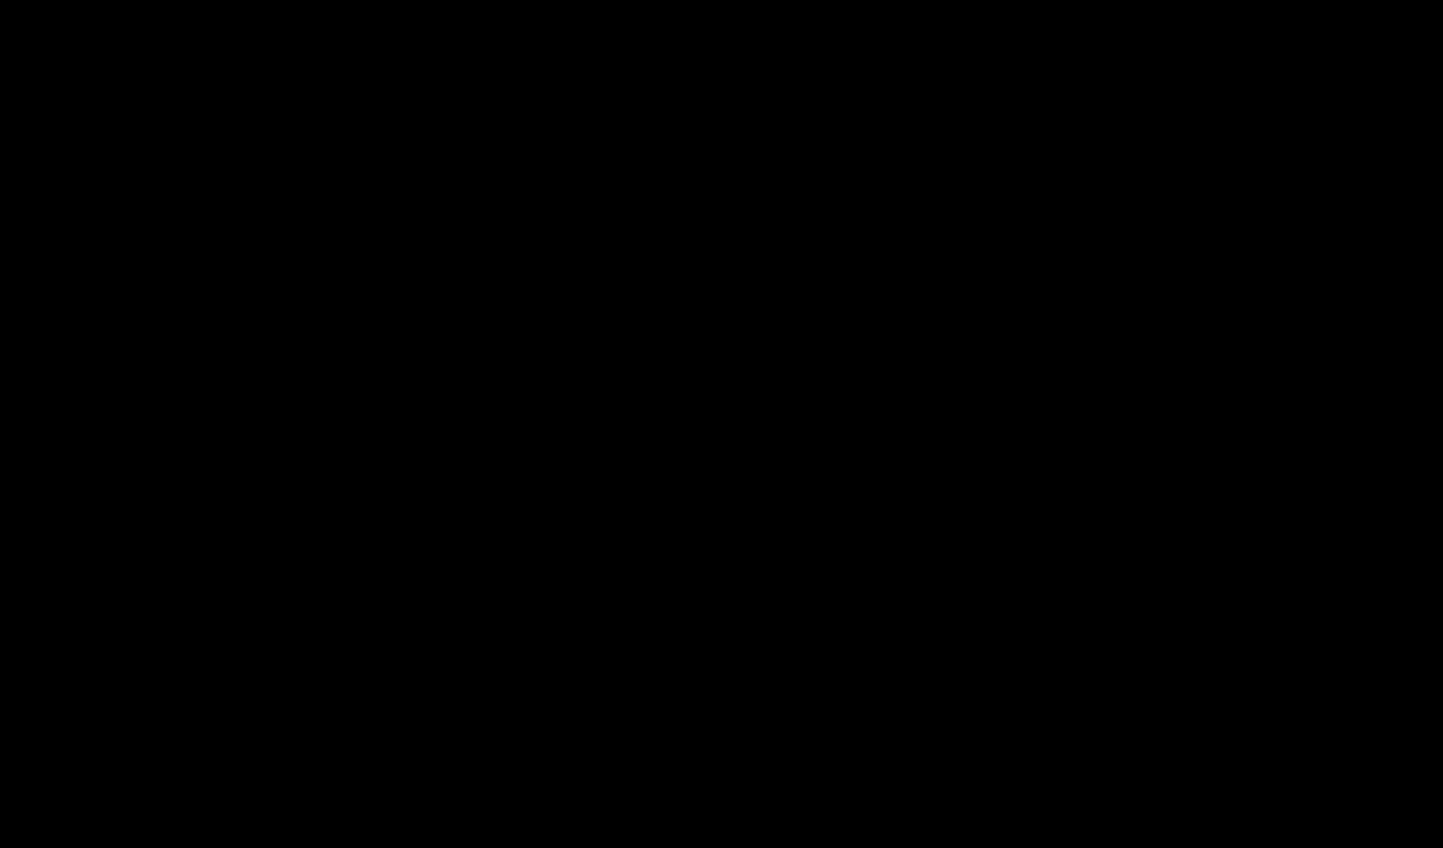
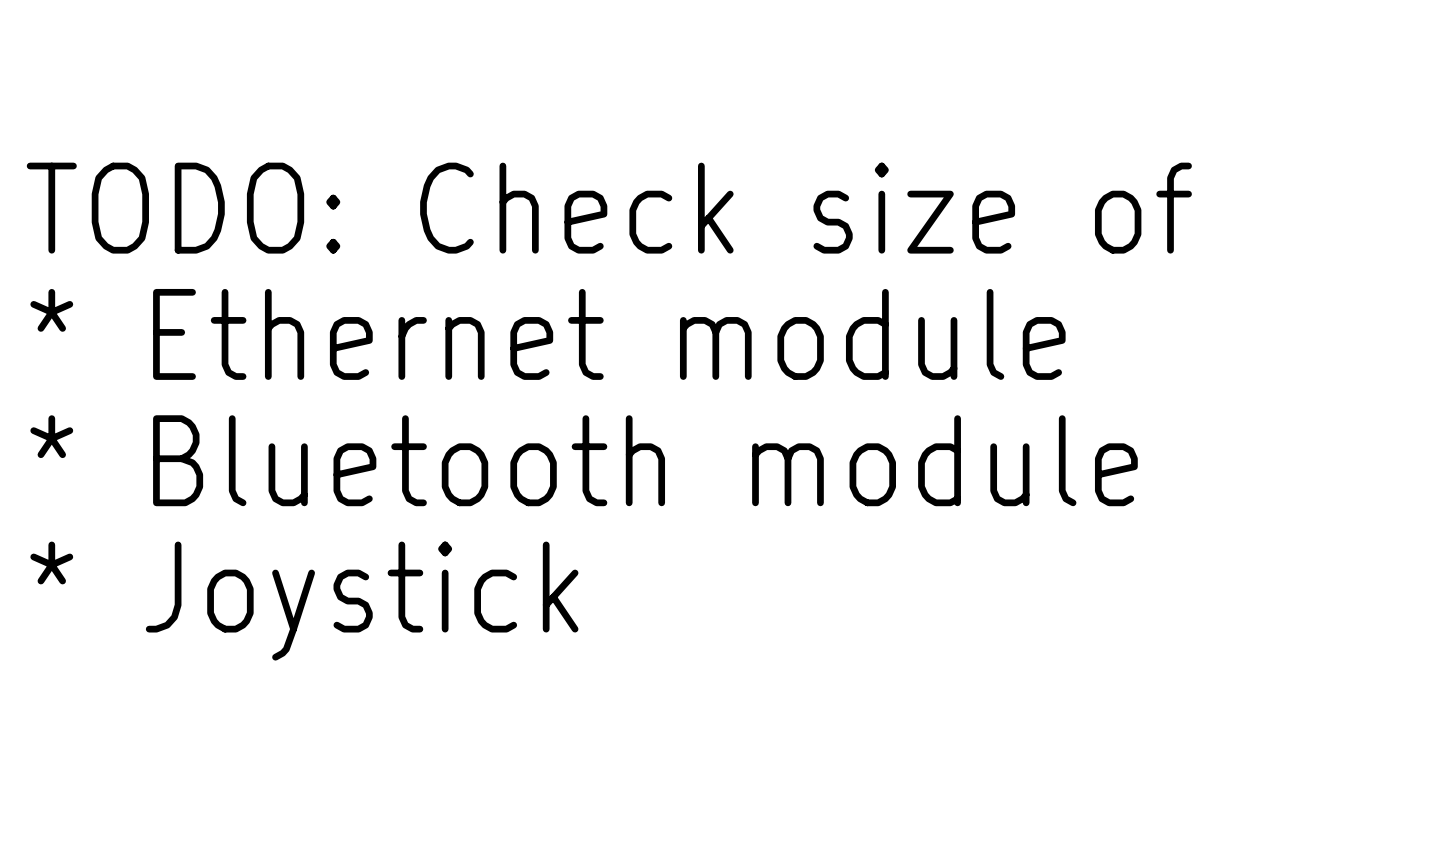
text: none -> TODO: Check size of (609, 208)
text: none -> * Ethernet module (547, 334)
text: none -> * Bluetooth module (584, 460)
text: none -> * Joystick (304, 601)

